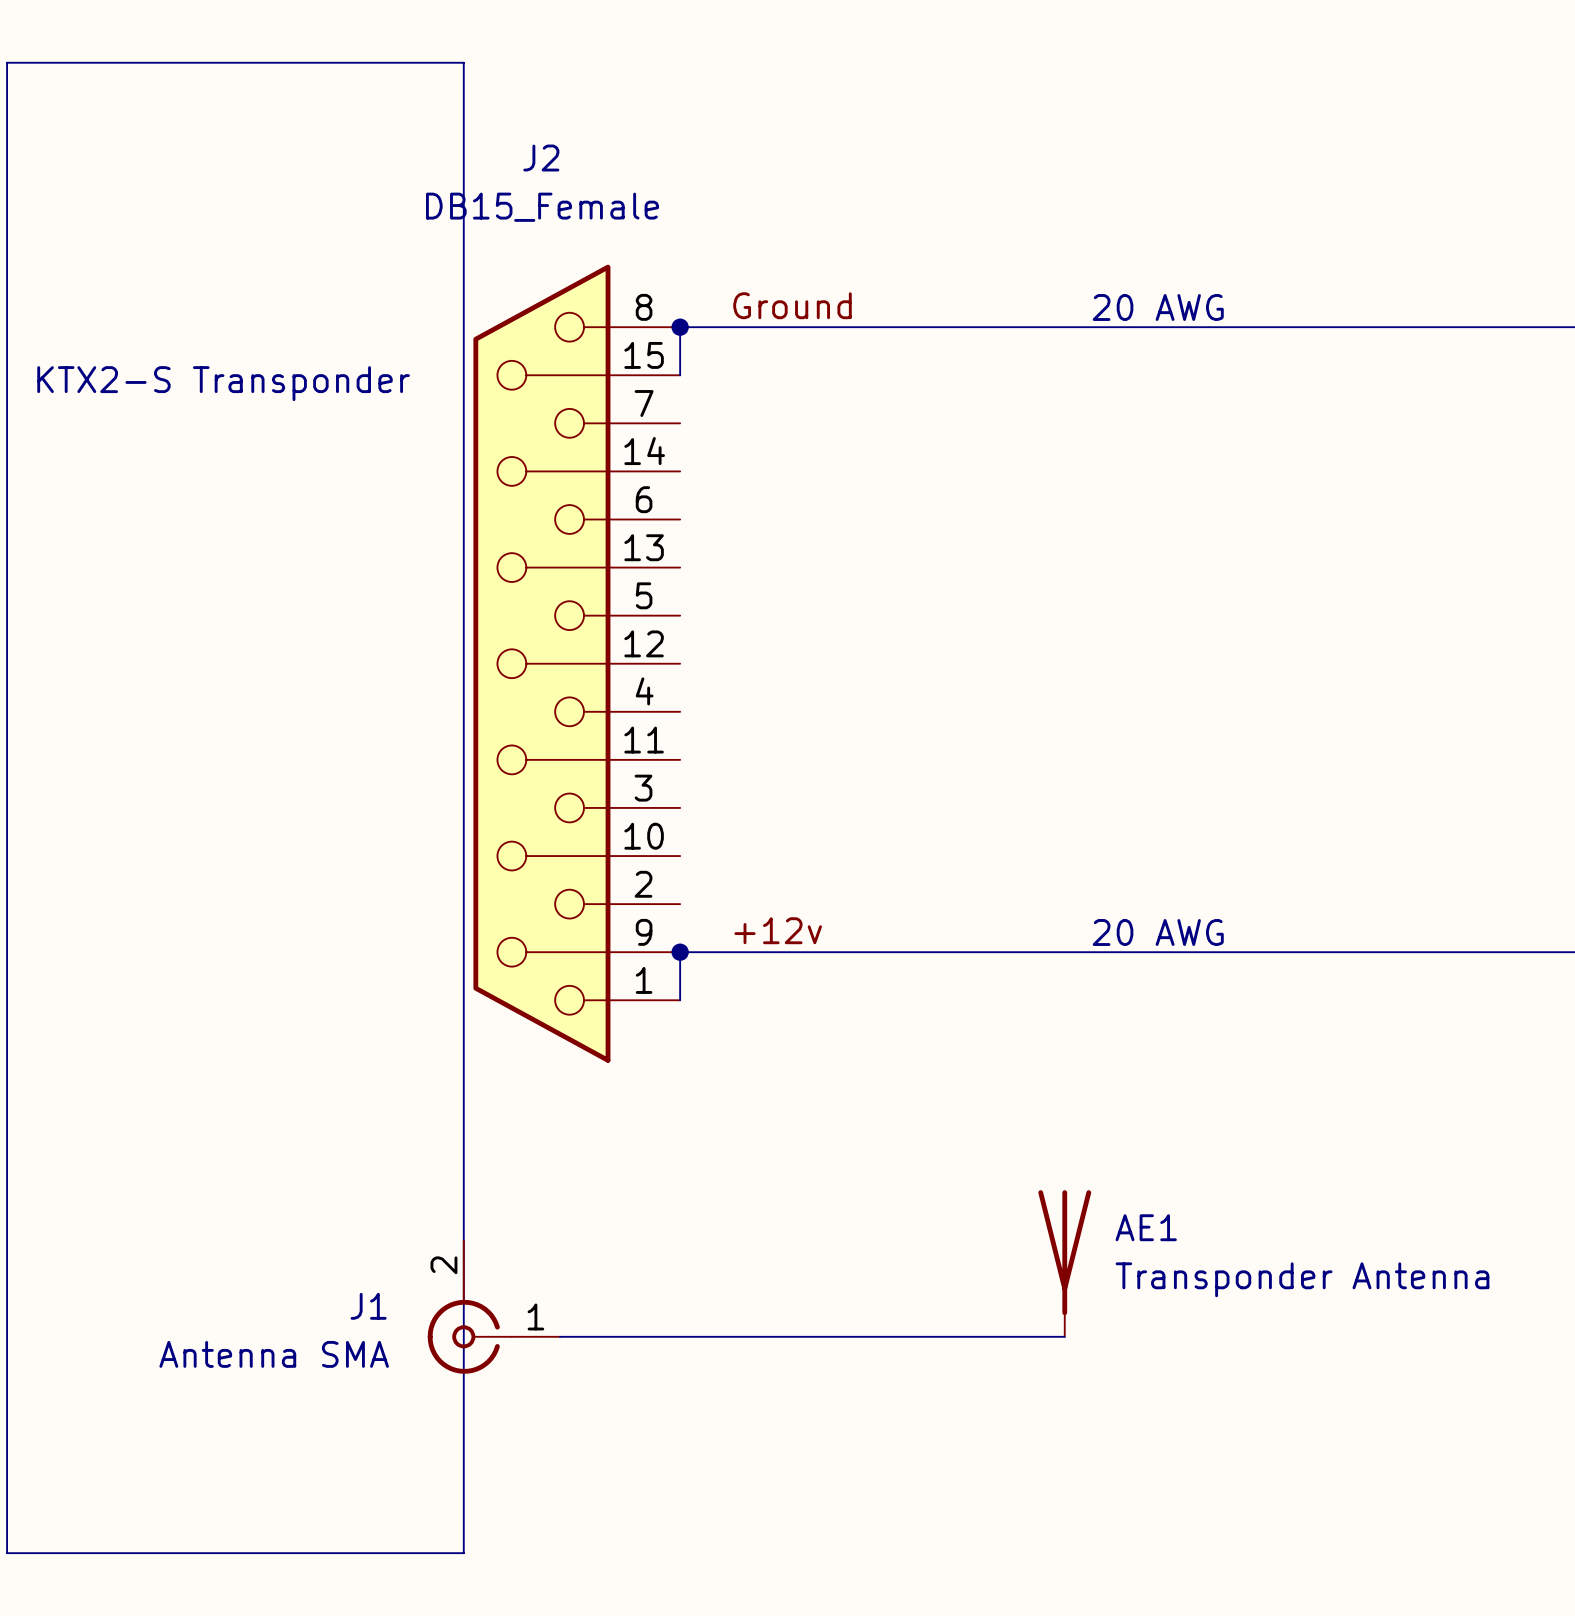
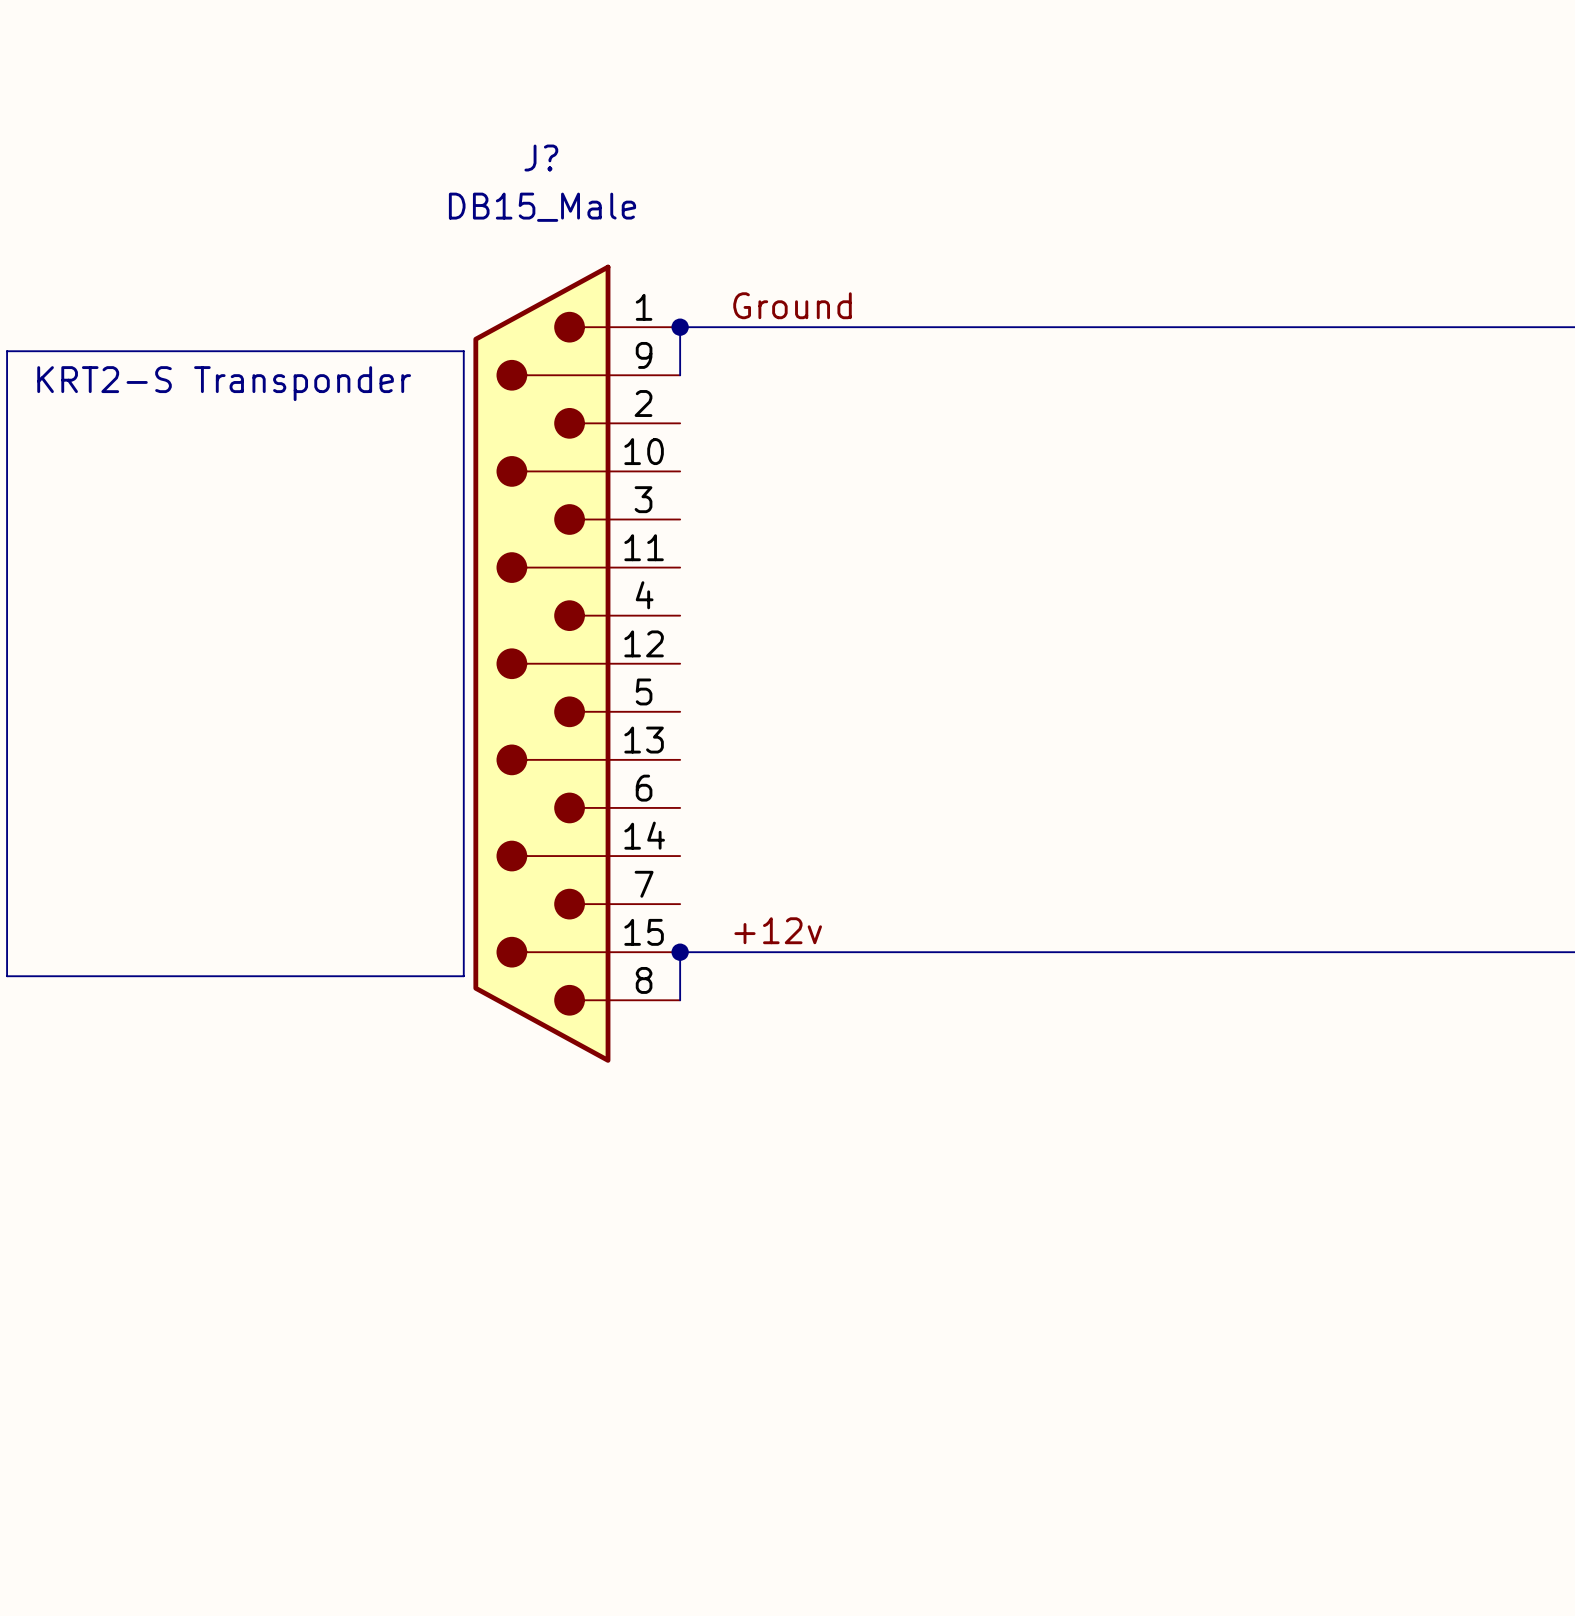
text: 20 AWG (1158, 307) -> none
line: (7, 351) (7, 62) (463, 62) (463, 351) -> (7, 351) (463, 351)
text: KTX2-S Transponder (223, 383) -> KRT2-S Transponder (224, 383)
J2: DB15_Female (576, 663) -> none
J?: none -> DB15_Male (576, 663)
text: 20 AWG (1158, 932) -> none
line: (7, 976) (7, 1553) (463, 1553) (463, 976) -> (7, 976) (463, 976)
AE1: Transponder Antenna (1064, 1263) -> none
J1: Antenna SMA (493, 1307) -> none
wire: (559, 1336) (1064, 1336) -> none

